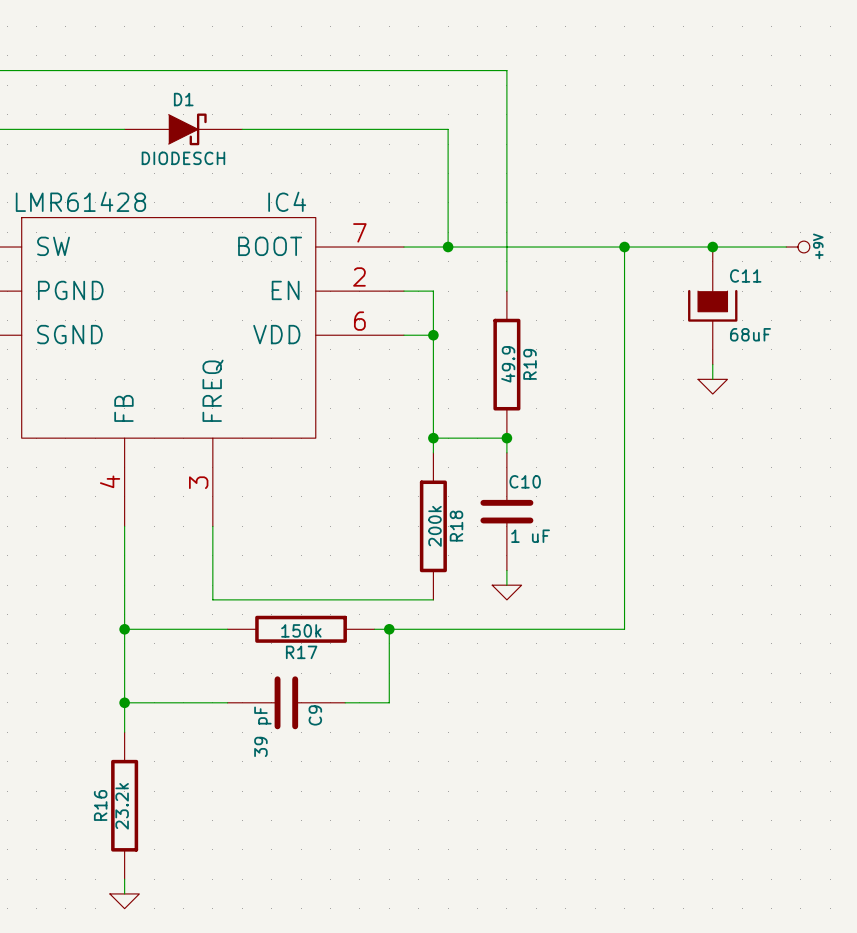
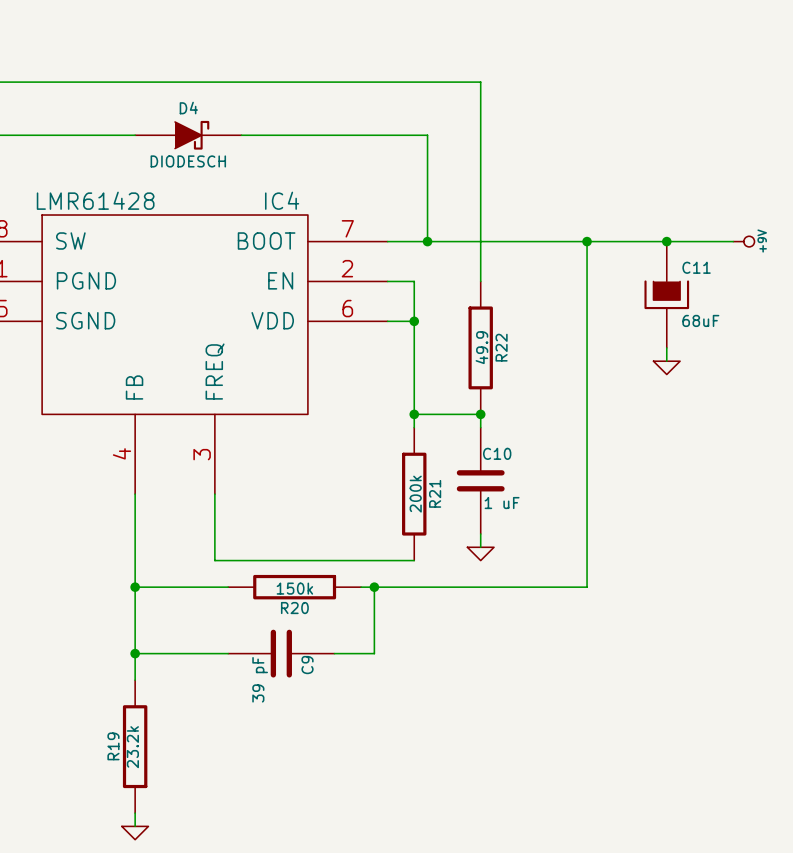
D1 name: D1 (183, 99) -> D4 (188, 108)
R19 name: R19 (529, 364) -> R22 (501, 347)
R18 name: R18 (456, 526) -> R21 (435, 493)
R17 name: R17 (301, 652) -> R20 (294, 608)
R16 name: R16 (100, 805) -> R19 (113, 746)

